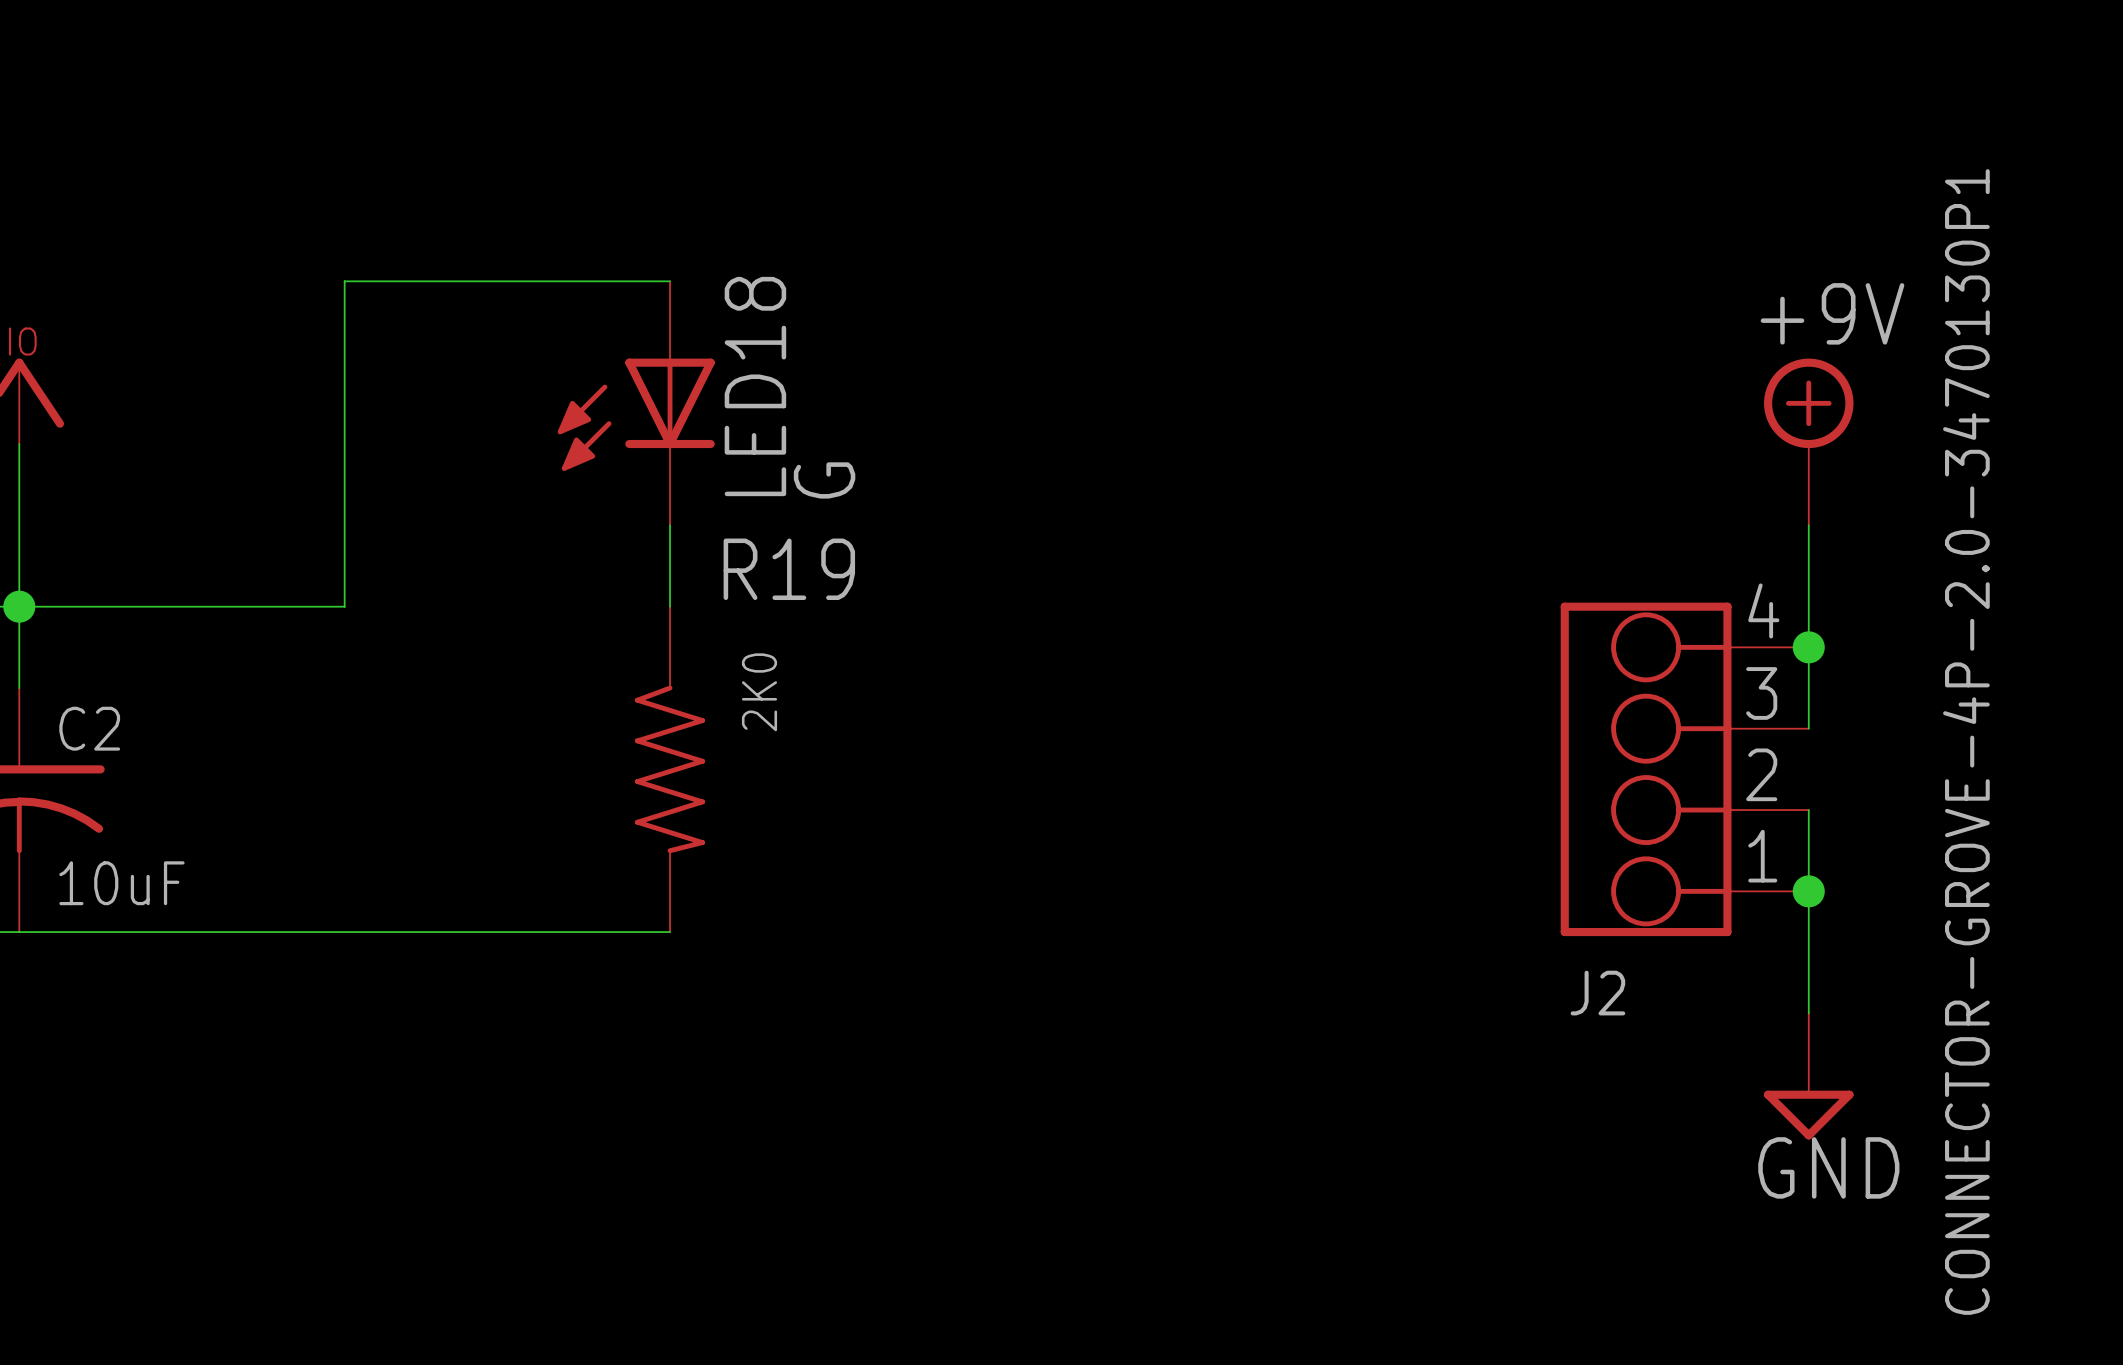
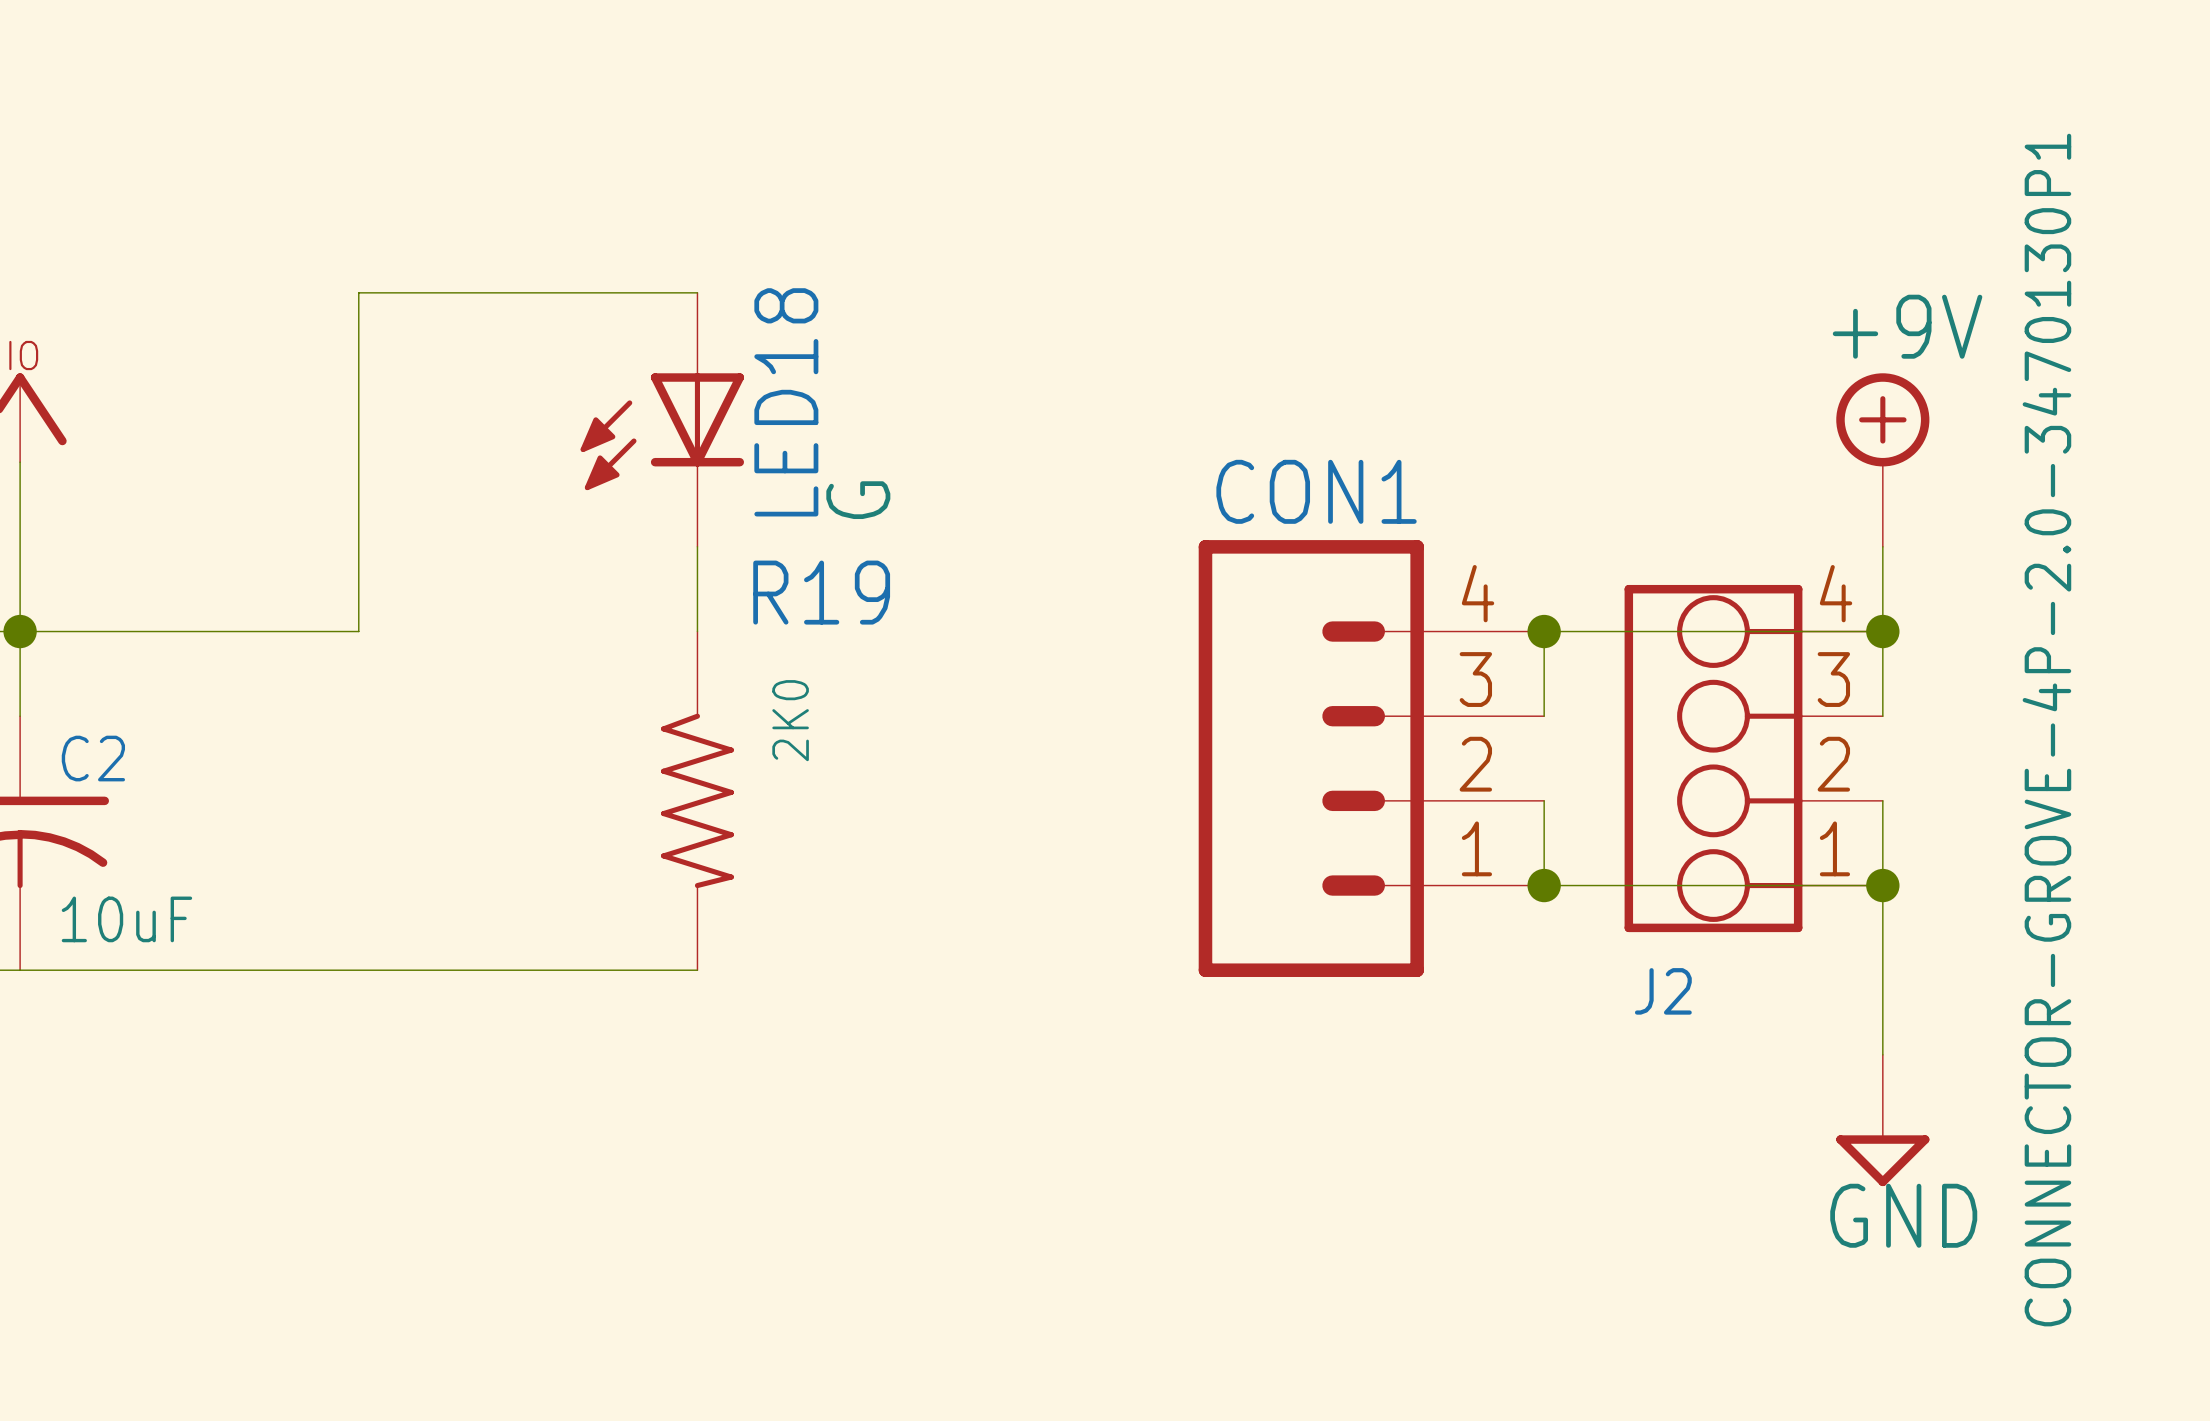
junction: none -> (1544, 631)
wire: none -> (1882, 631) (1544, 631) (1544, 716)
junction position: (1808, 647) -> (1882, 631)
wire: (1808, 688) (1808, 728) -> (1882, 800) (1882, 843)
CON1: none -> (1371, 758)
wire: none -> (1544, 800) (1544, 885) (1882, 885)
J2 position: (1684, 769) -> (1753, 758)
junction: none -> (1544, 885)
junction position: (1808, 891) -> (1882, 885)

